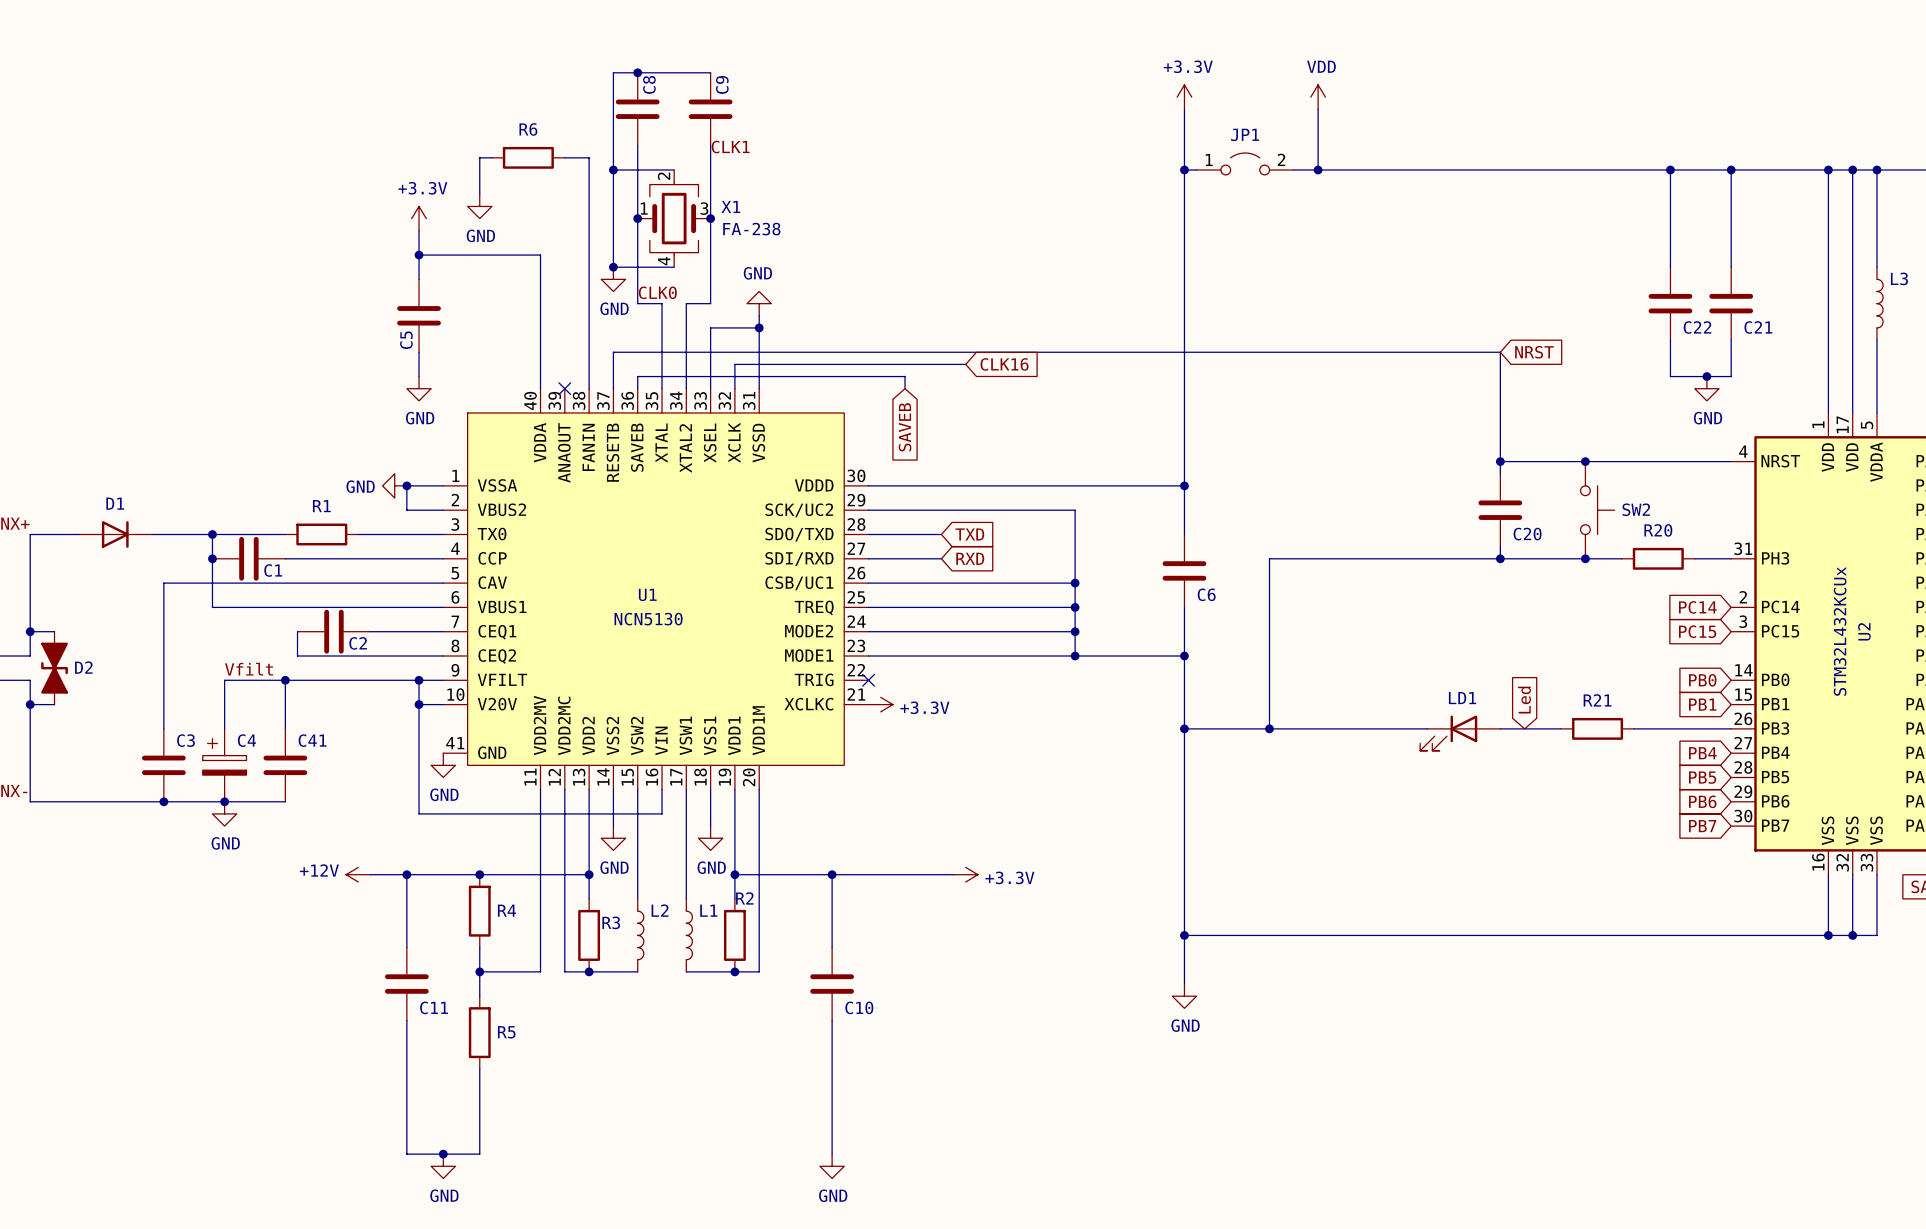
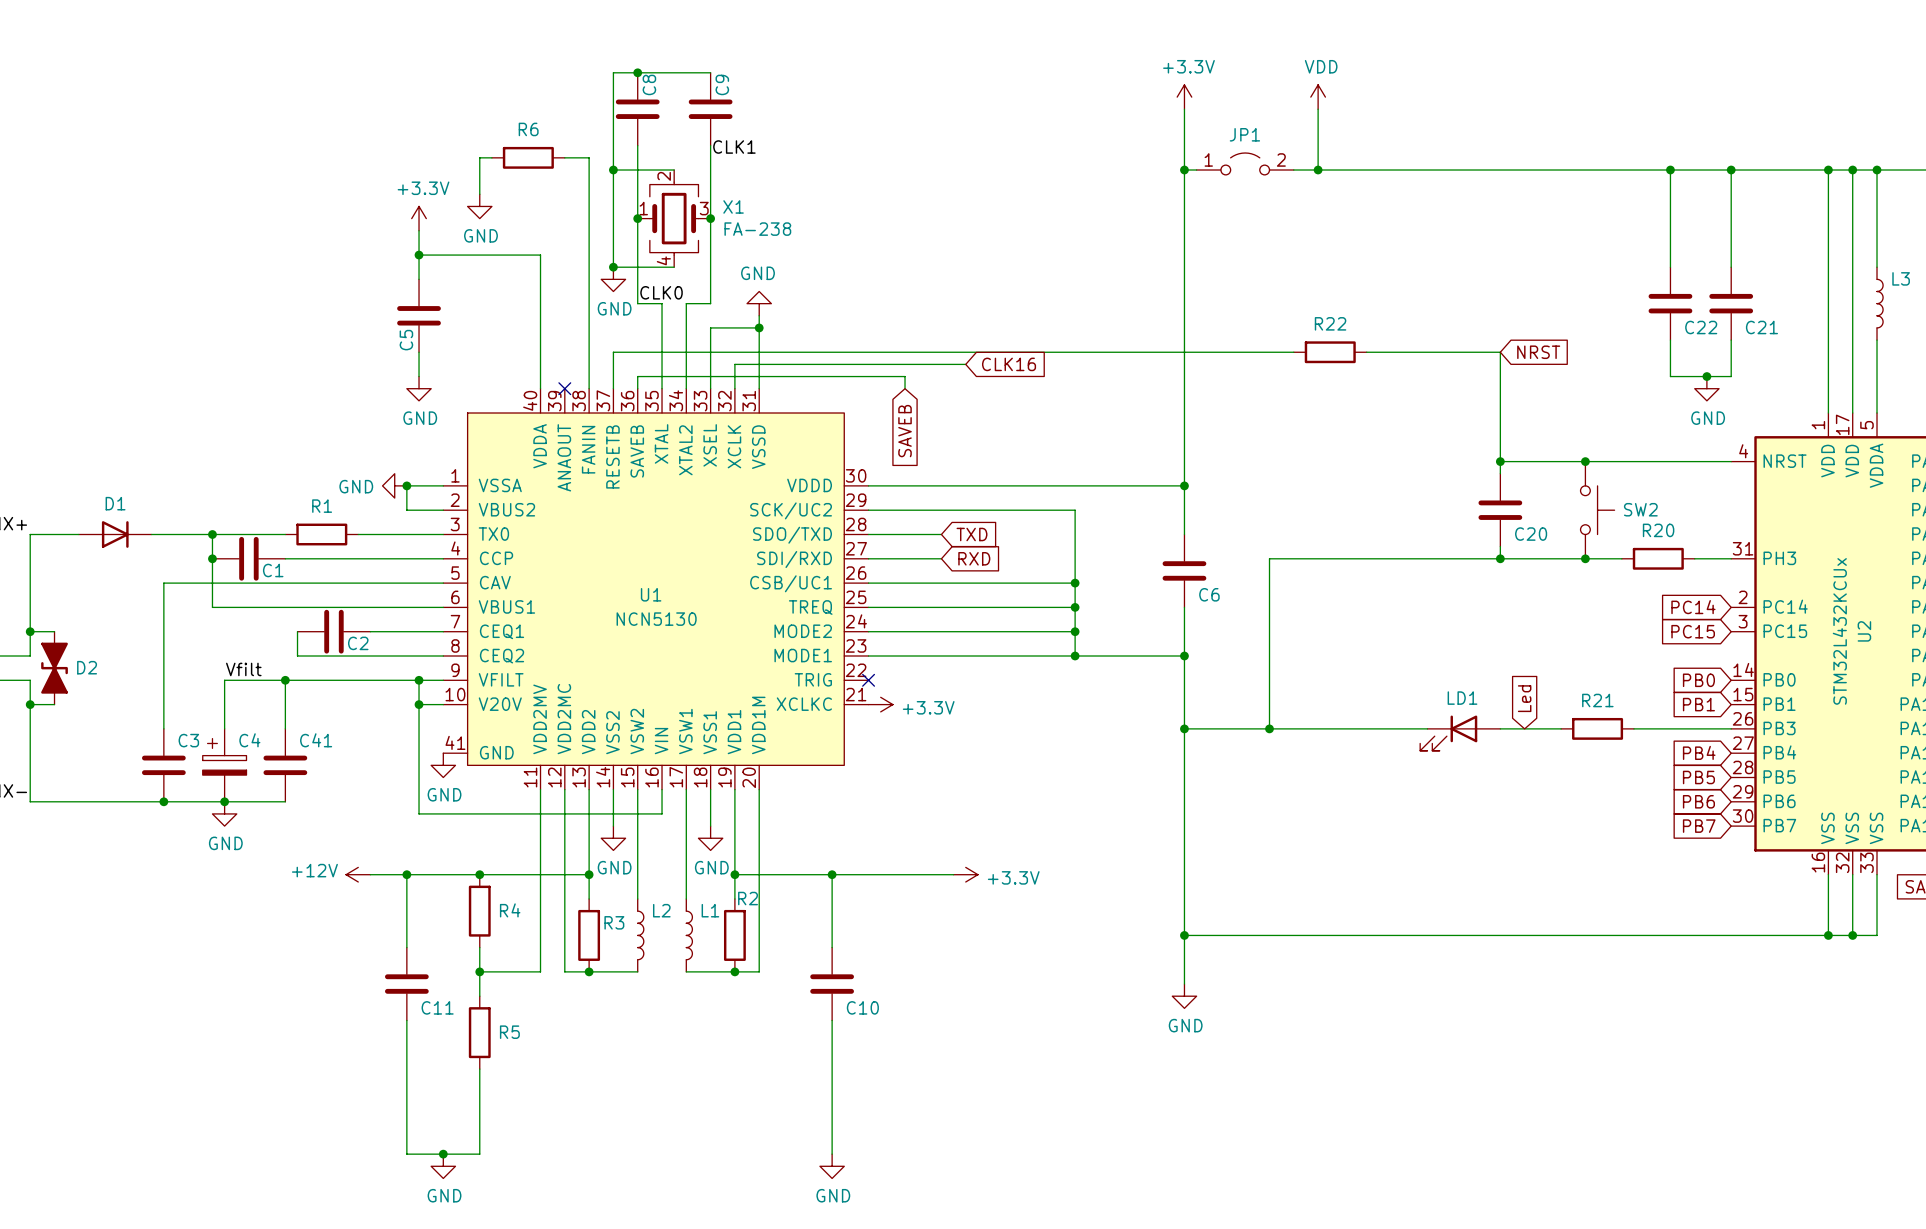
wire: (1293, 352) (1366, 352) -> none
R22: none -> (1330, 352)

